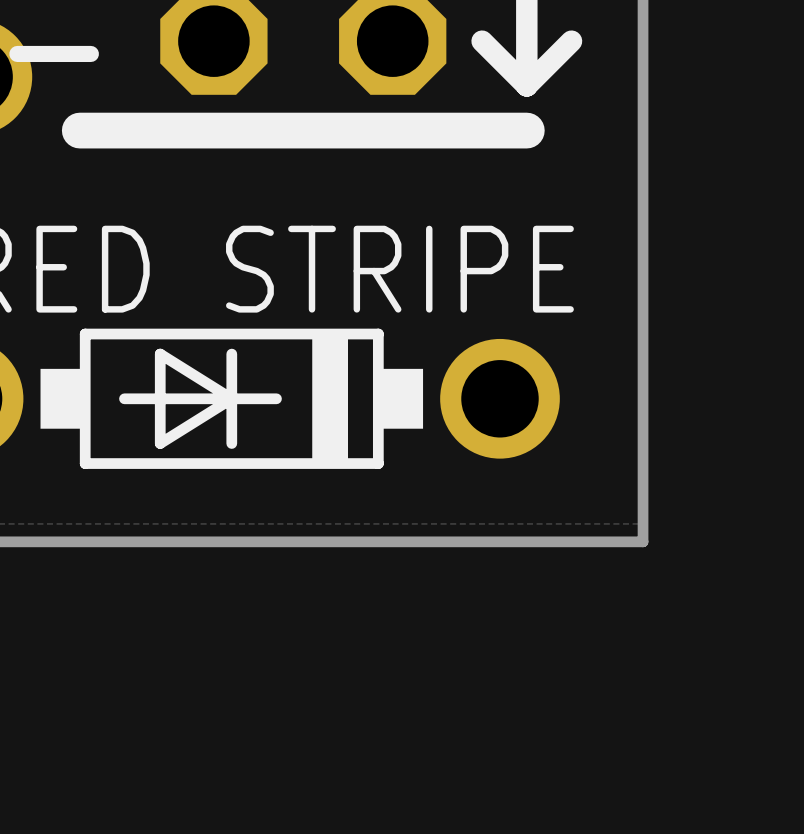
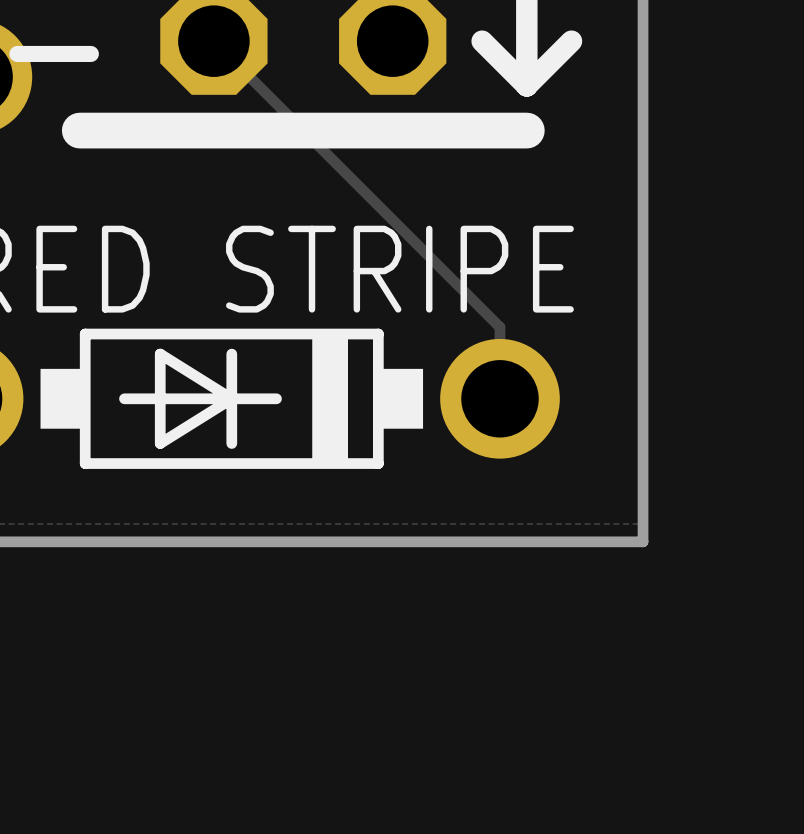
track: none -> (213, 41) (499, 327) (499, 398)

